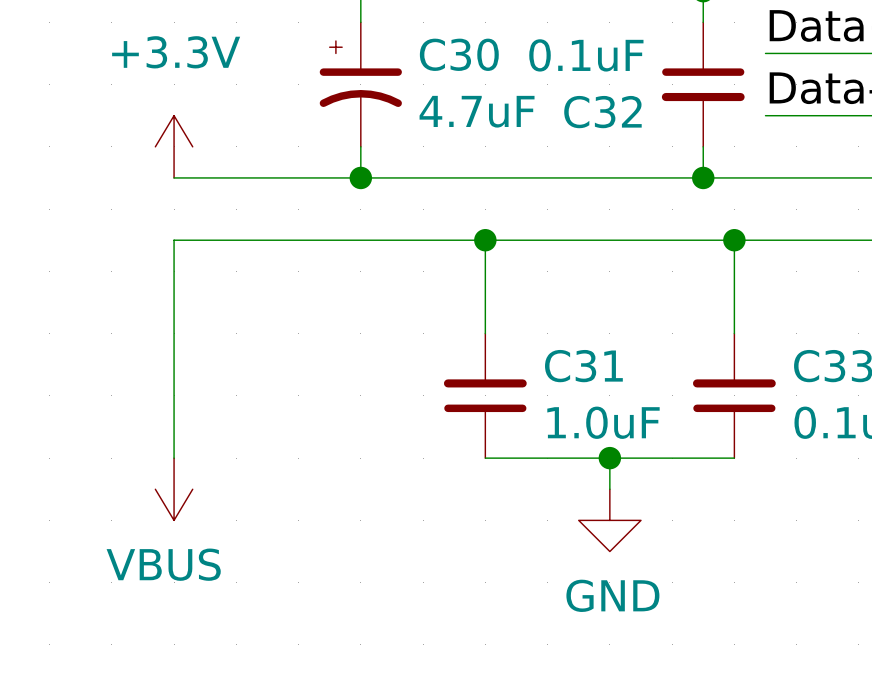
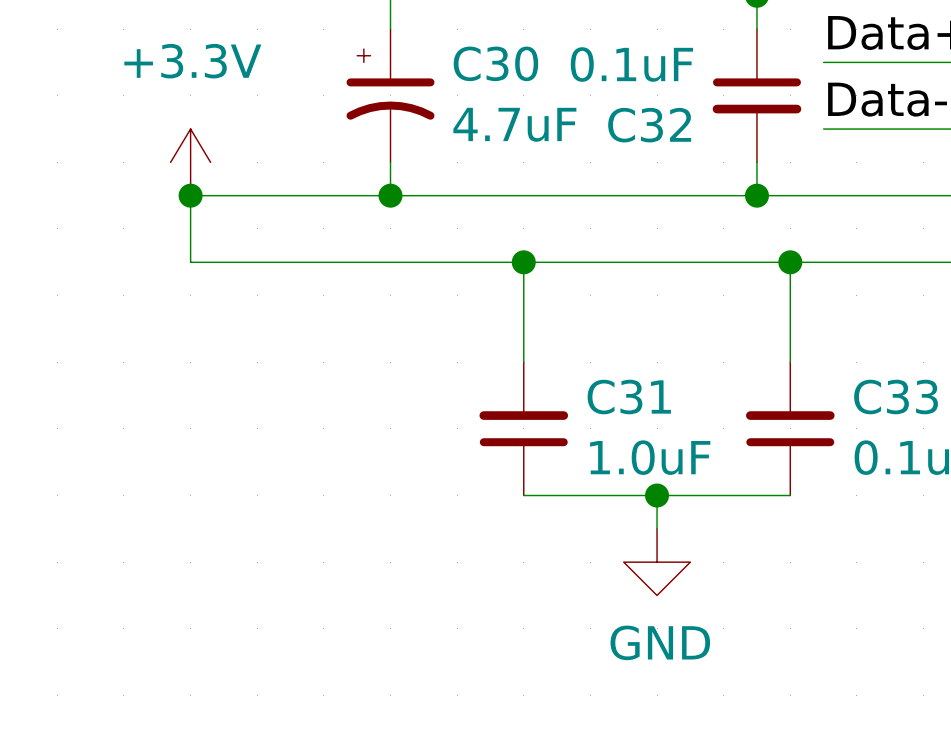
junction: none -> (190, 195)
wire: (174, 240) (174, 458) -> (190, 262) (190, 195)
power symbol: VBUS (174, 489) -> none

